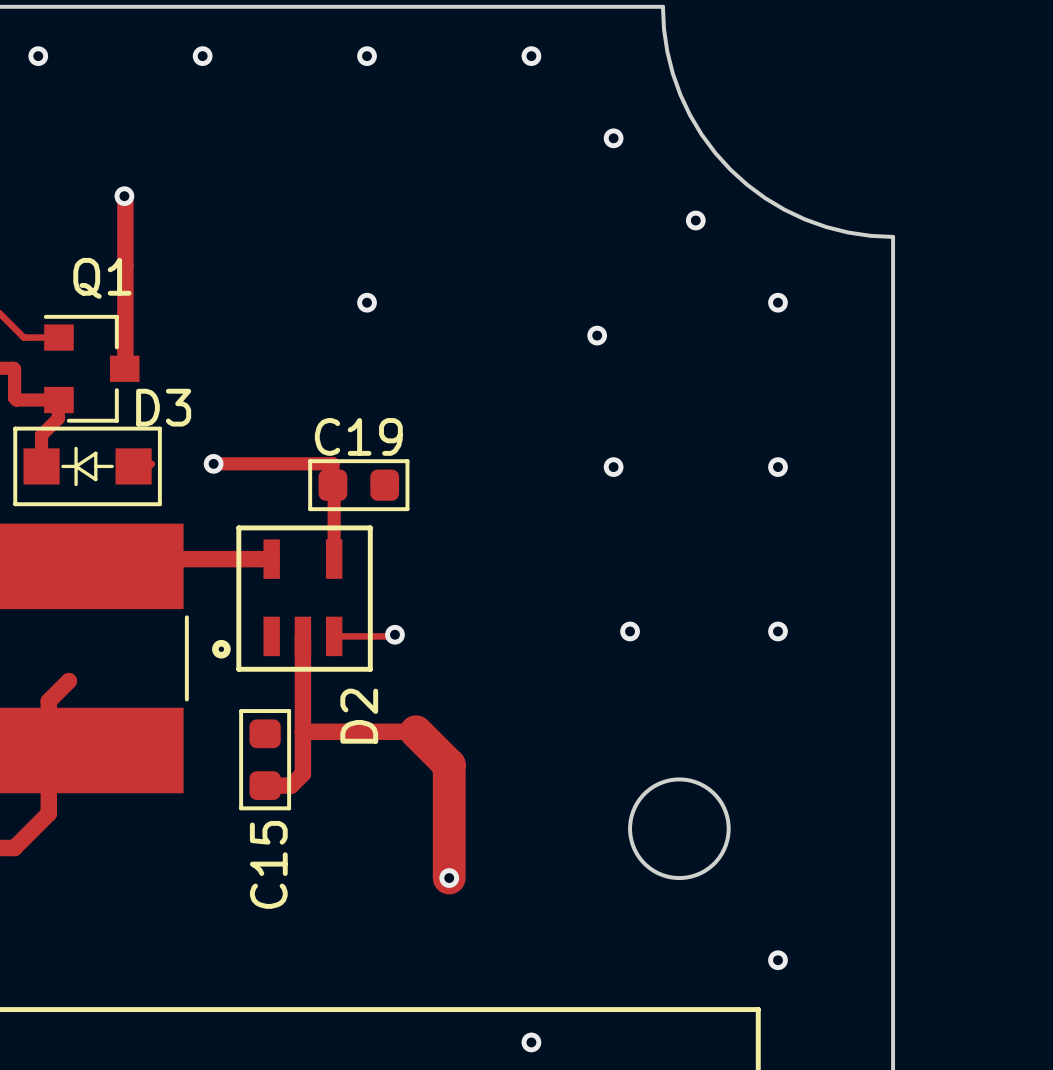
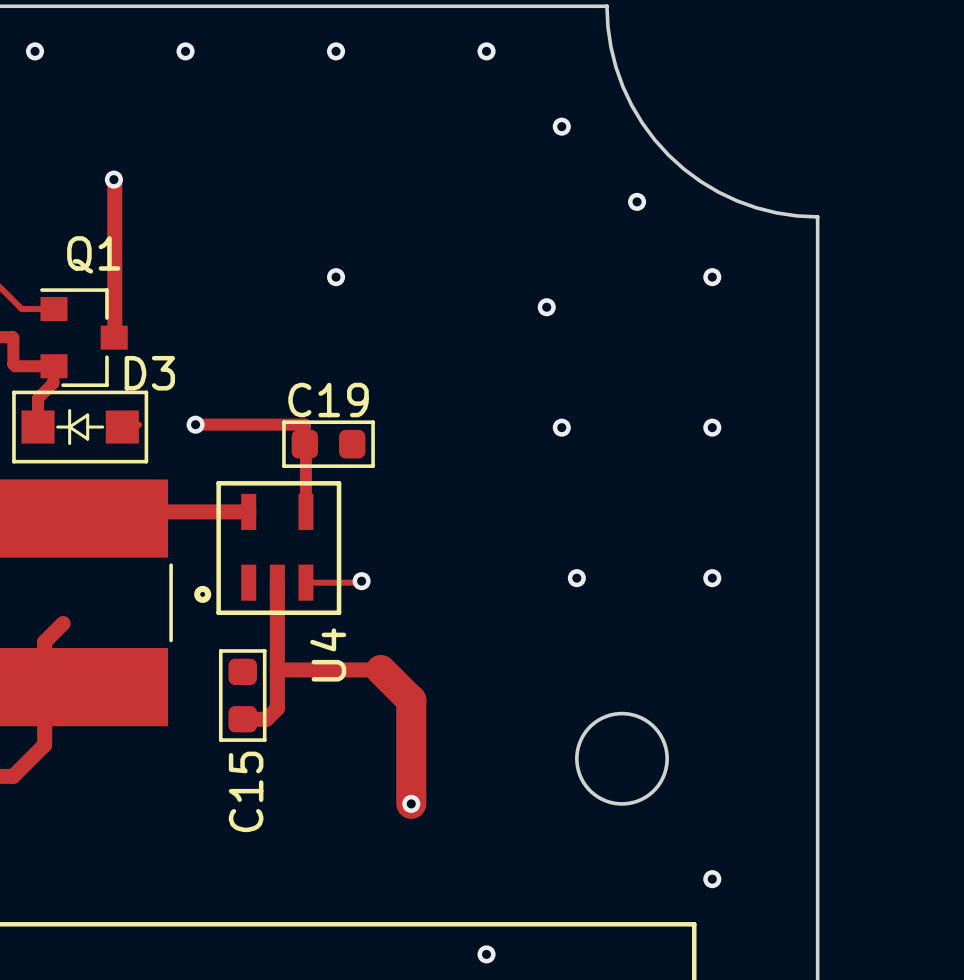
D2 name: D2 (359, 716) -> U4 (328, 654)

